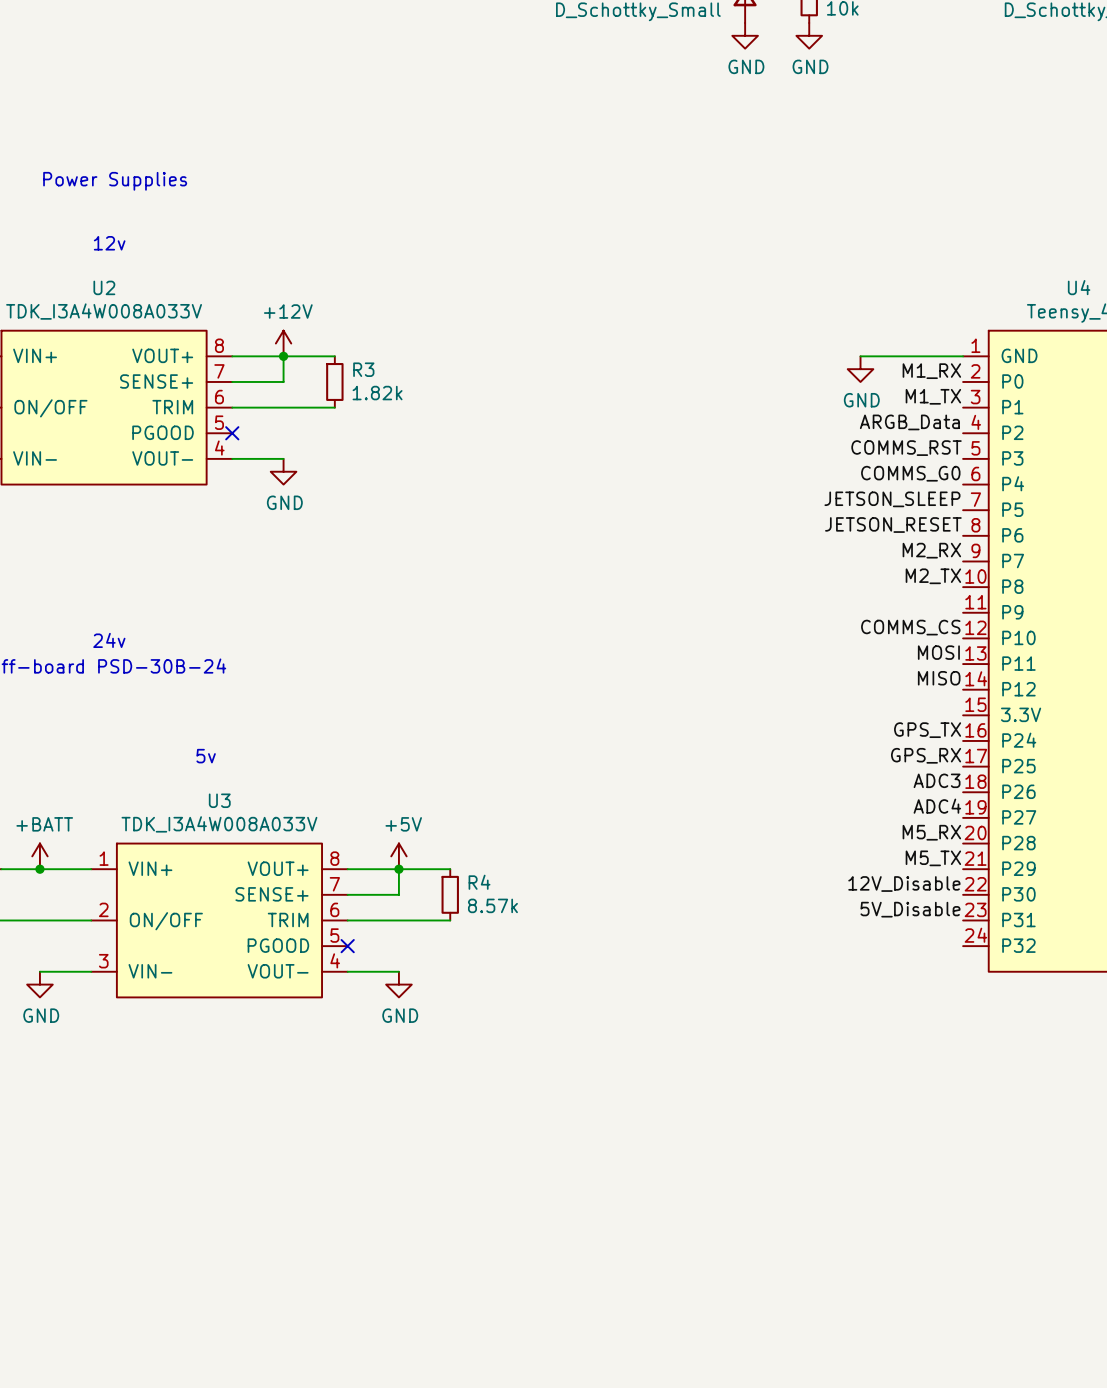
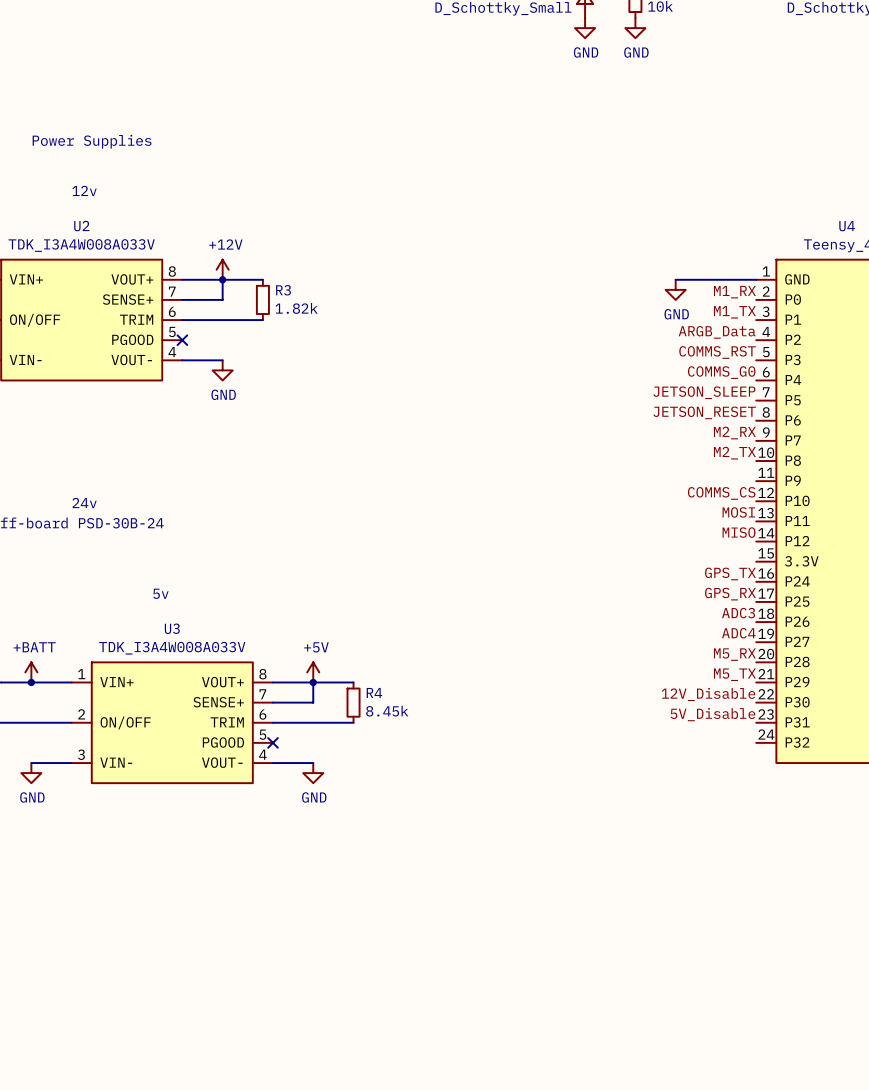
R4 value: 8.57k (492, 905) -> 8.45k (387, 711)

